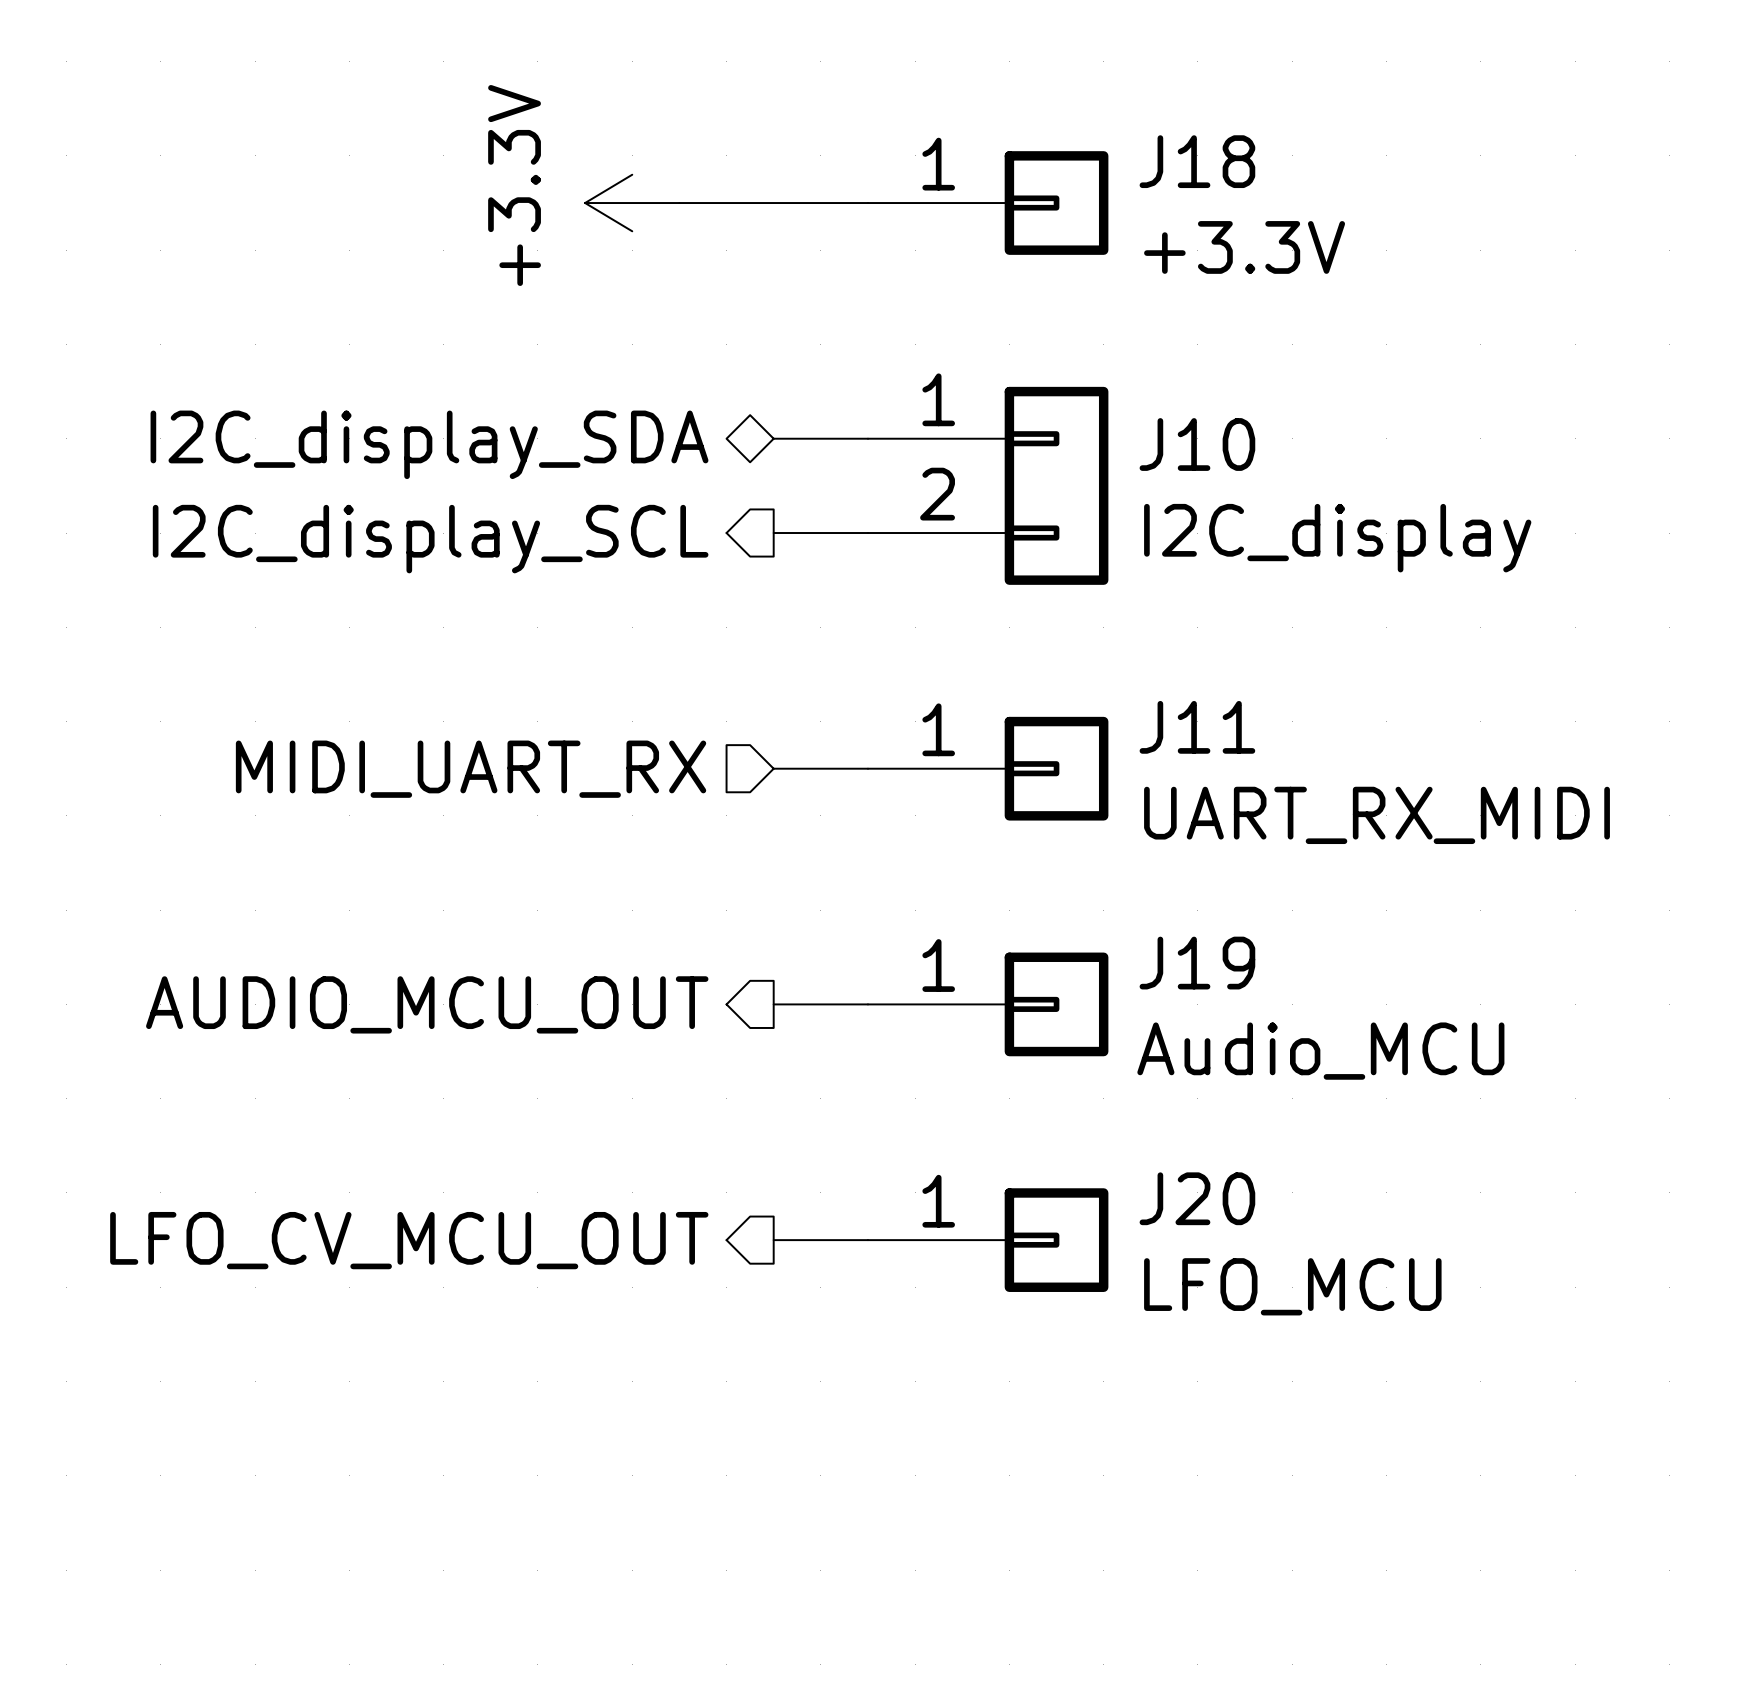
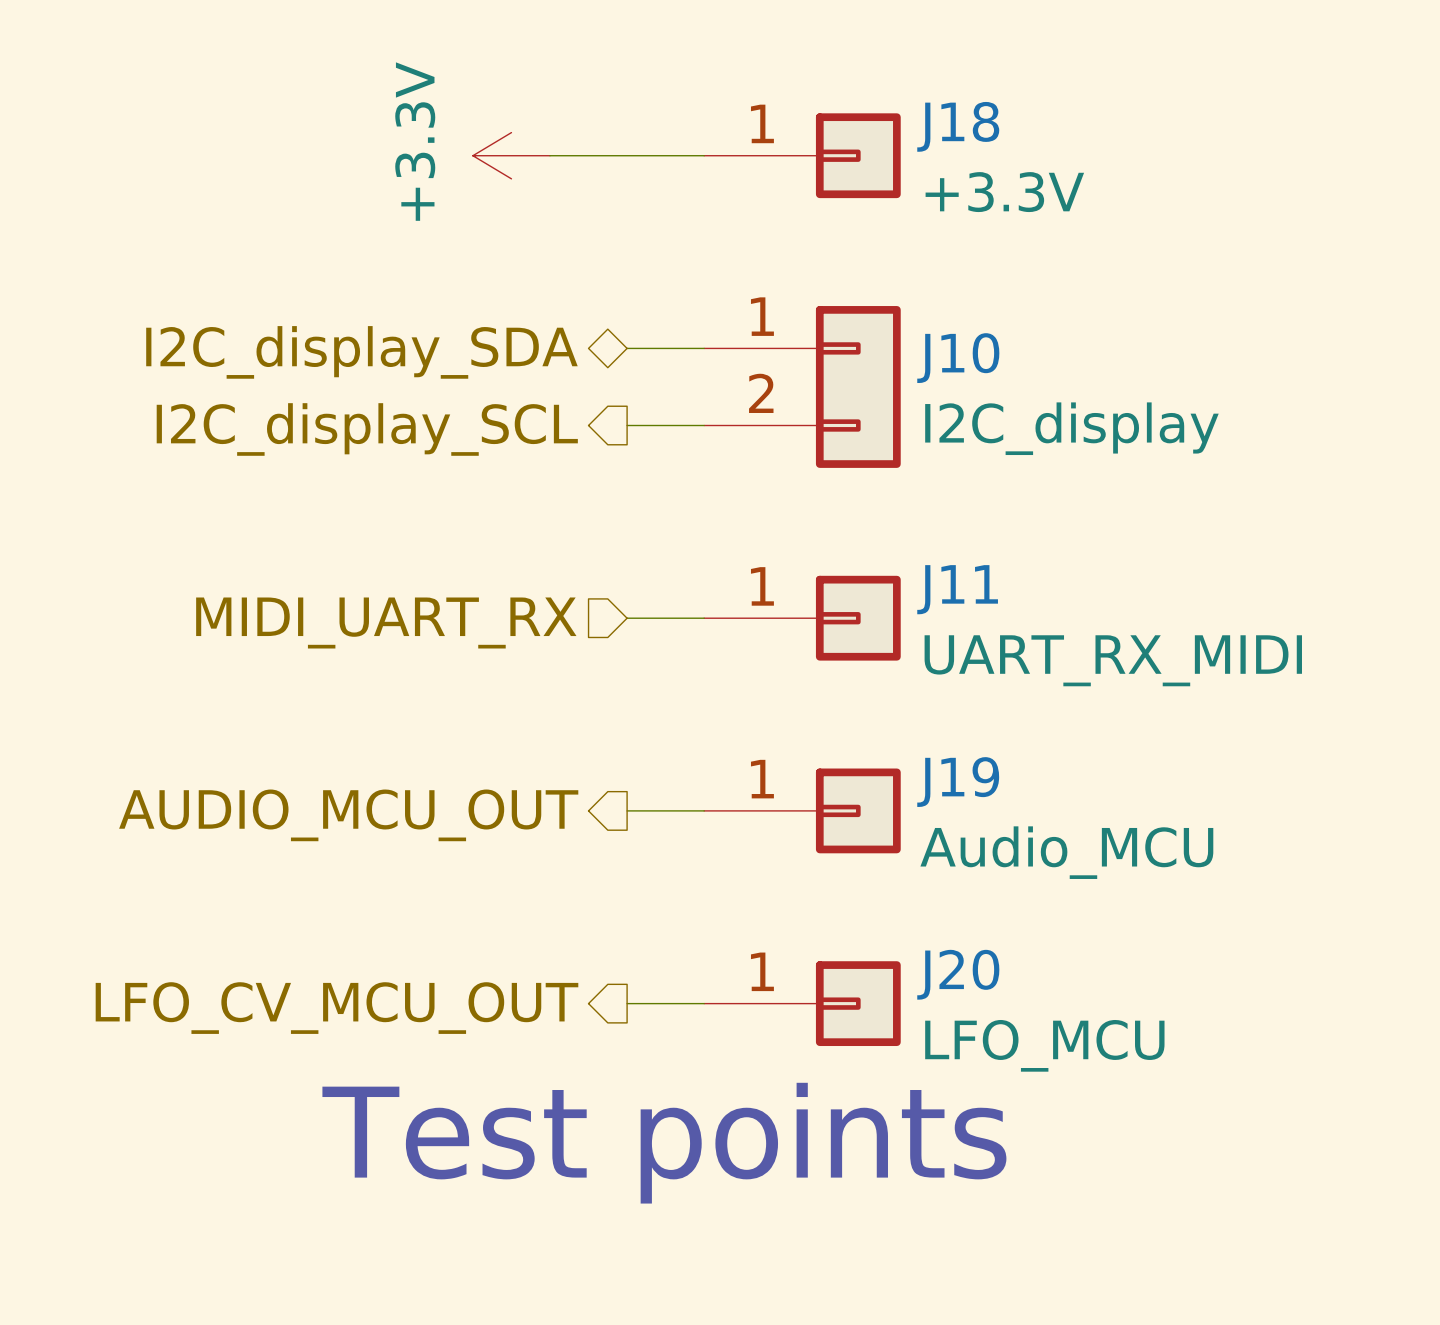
text: none -> Test points (664, 1143)

